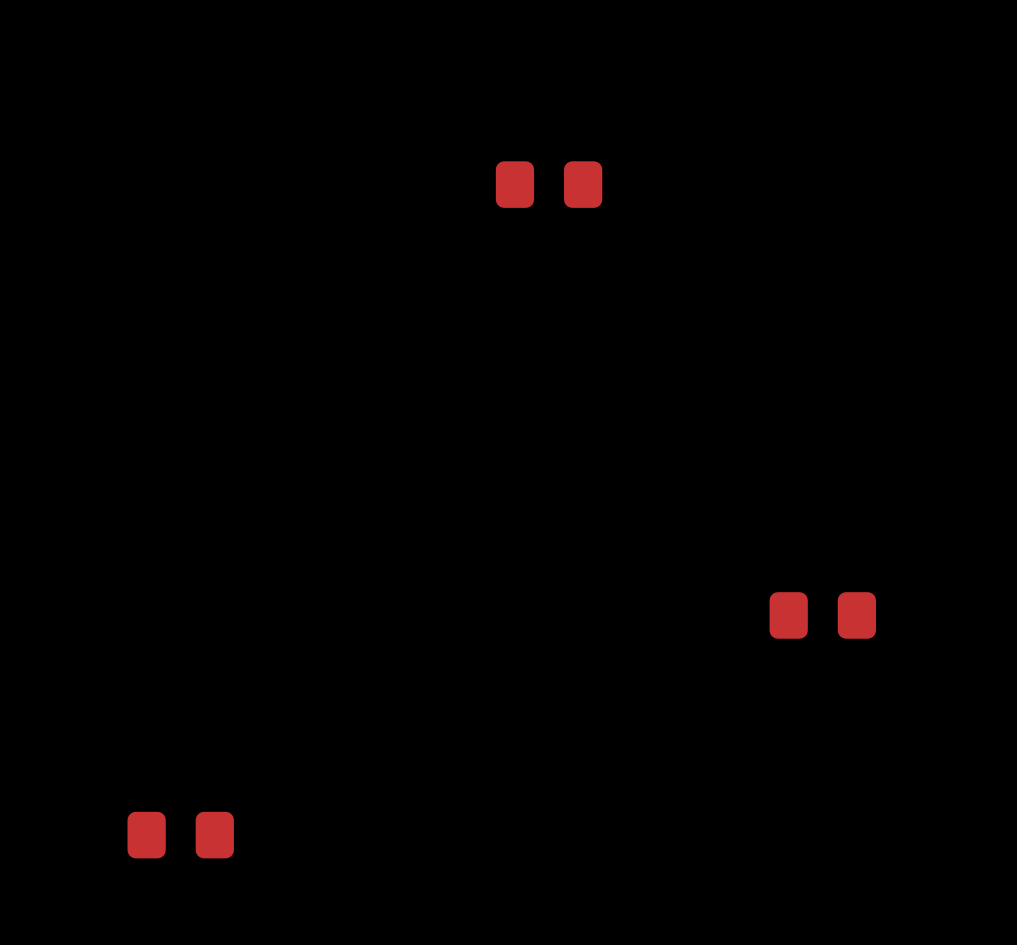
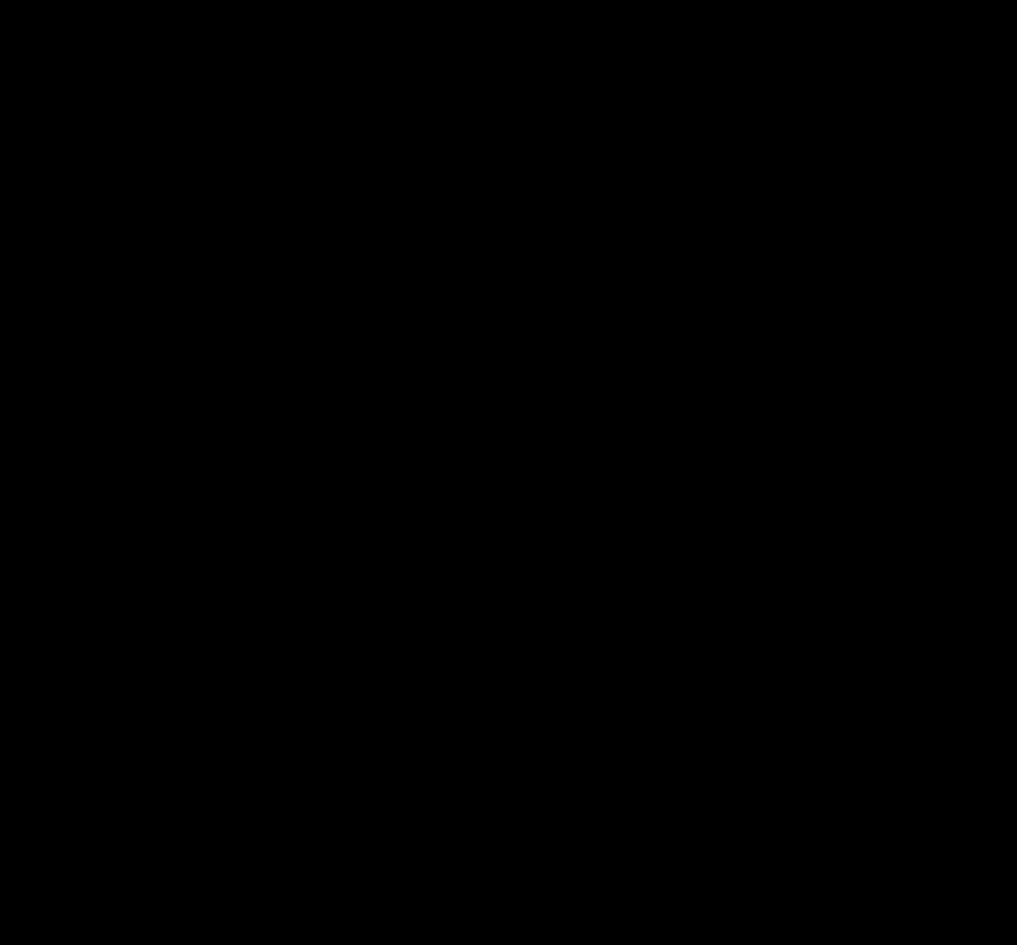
part: (549, 184) -> none
part: (822, 615) -> none
part: (180, 835) -> none

